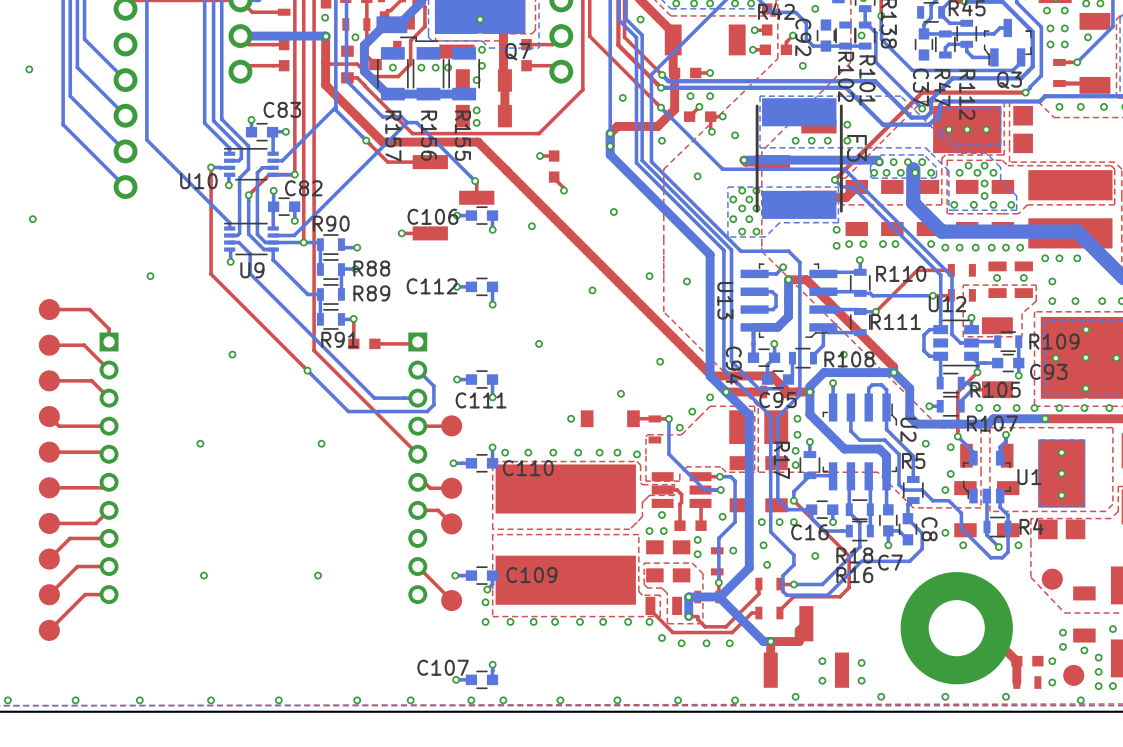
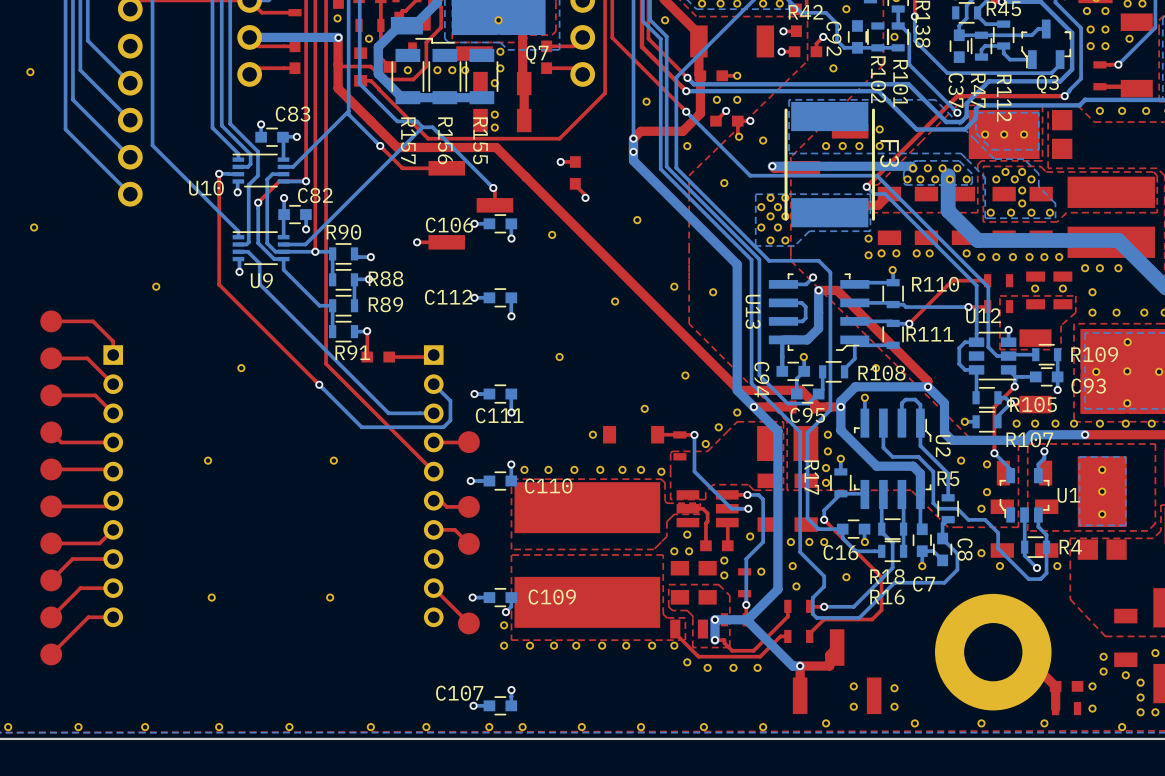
part: (1052, 579) -> none
part: (1073, 675) -> none

